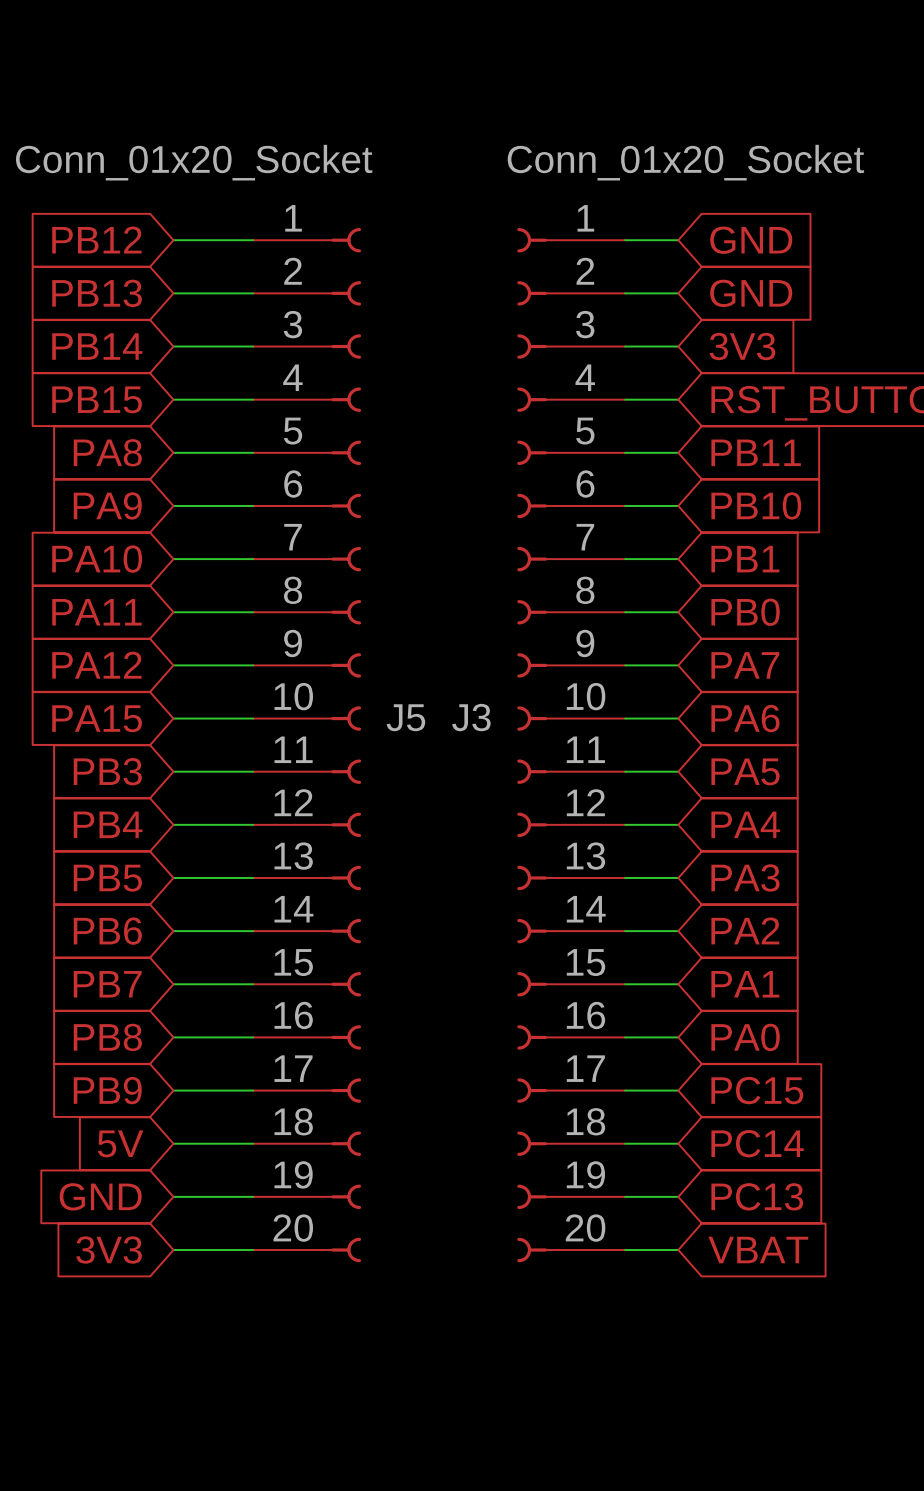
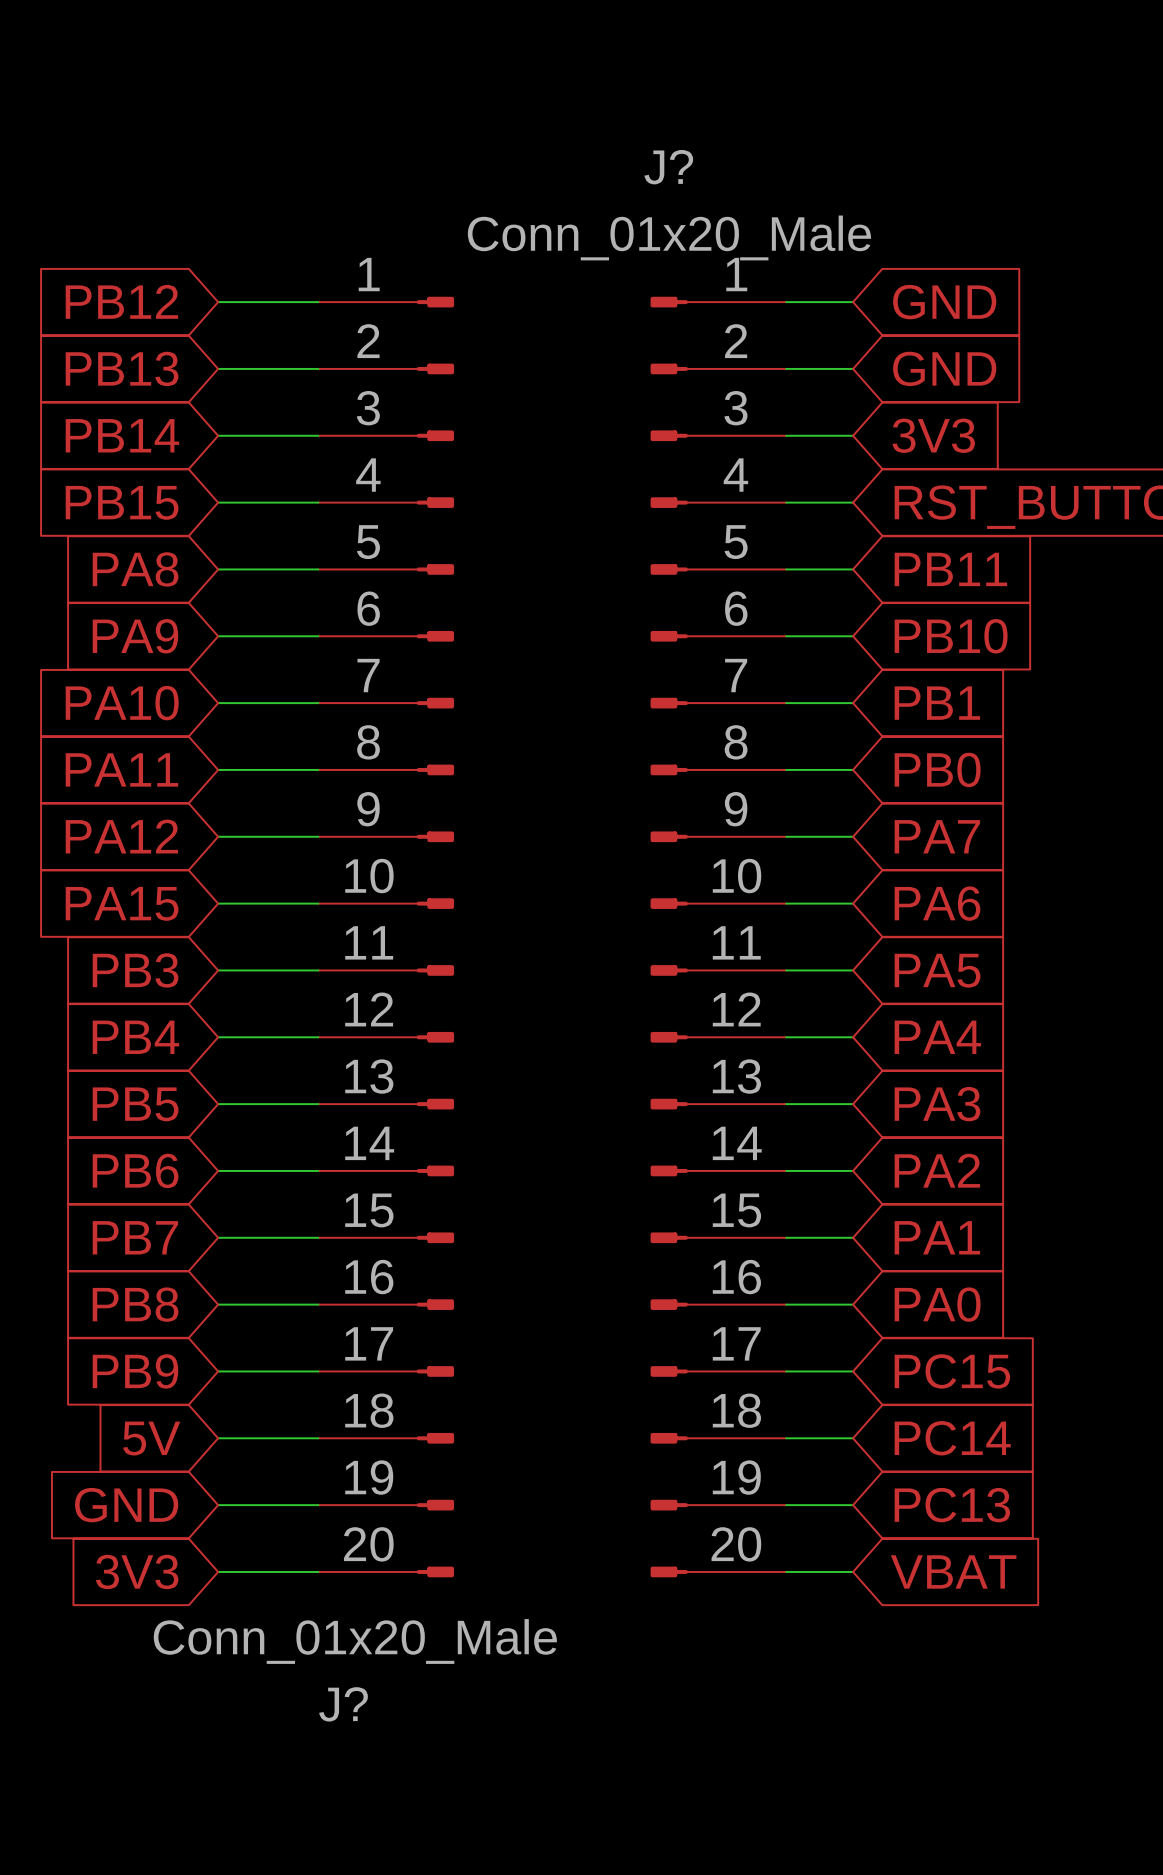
J5: Conn_01x20_Socket (307, 745) -> none
J?: none -> Conn_01x20_Male (386, 937)
J3: Conn_01x20_Socket (571, 745) -> none
J?: none -> Conn_01x20_Male (718, 937)

